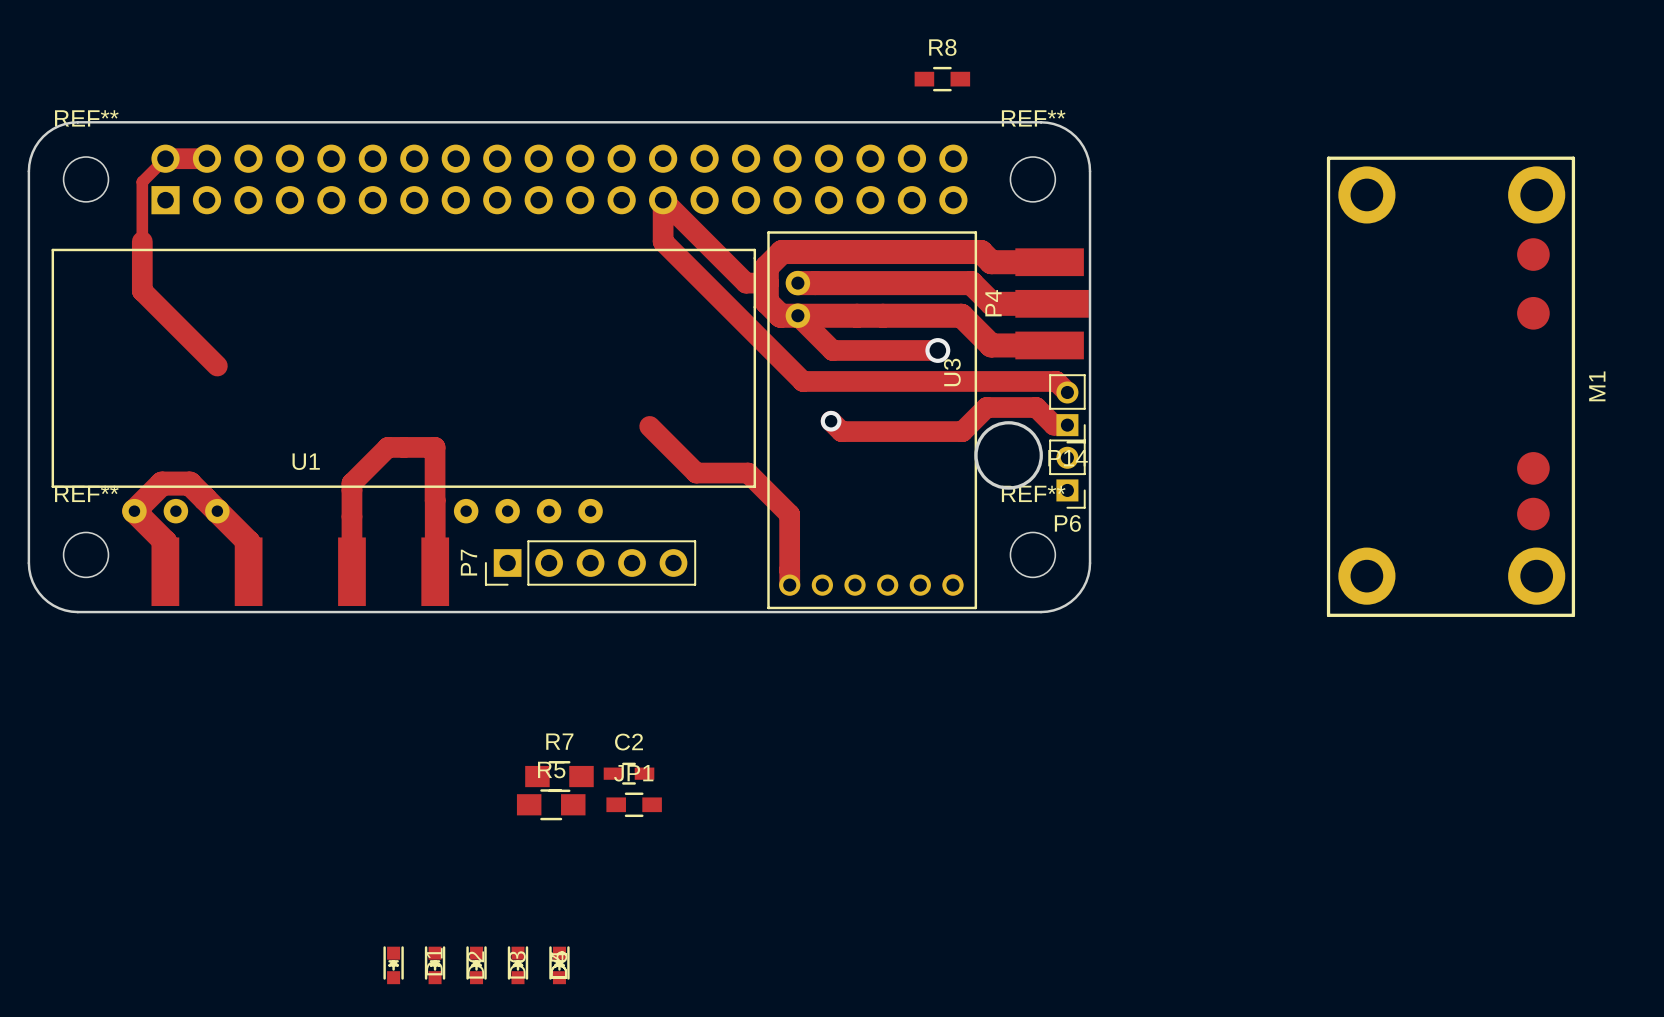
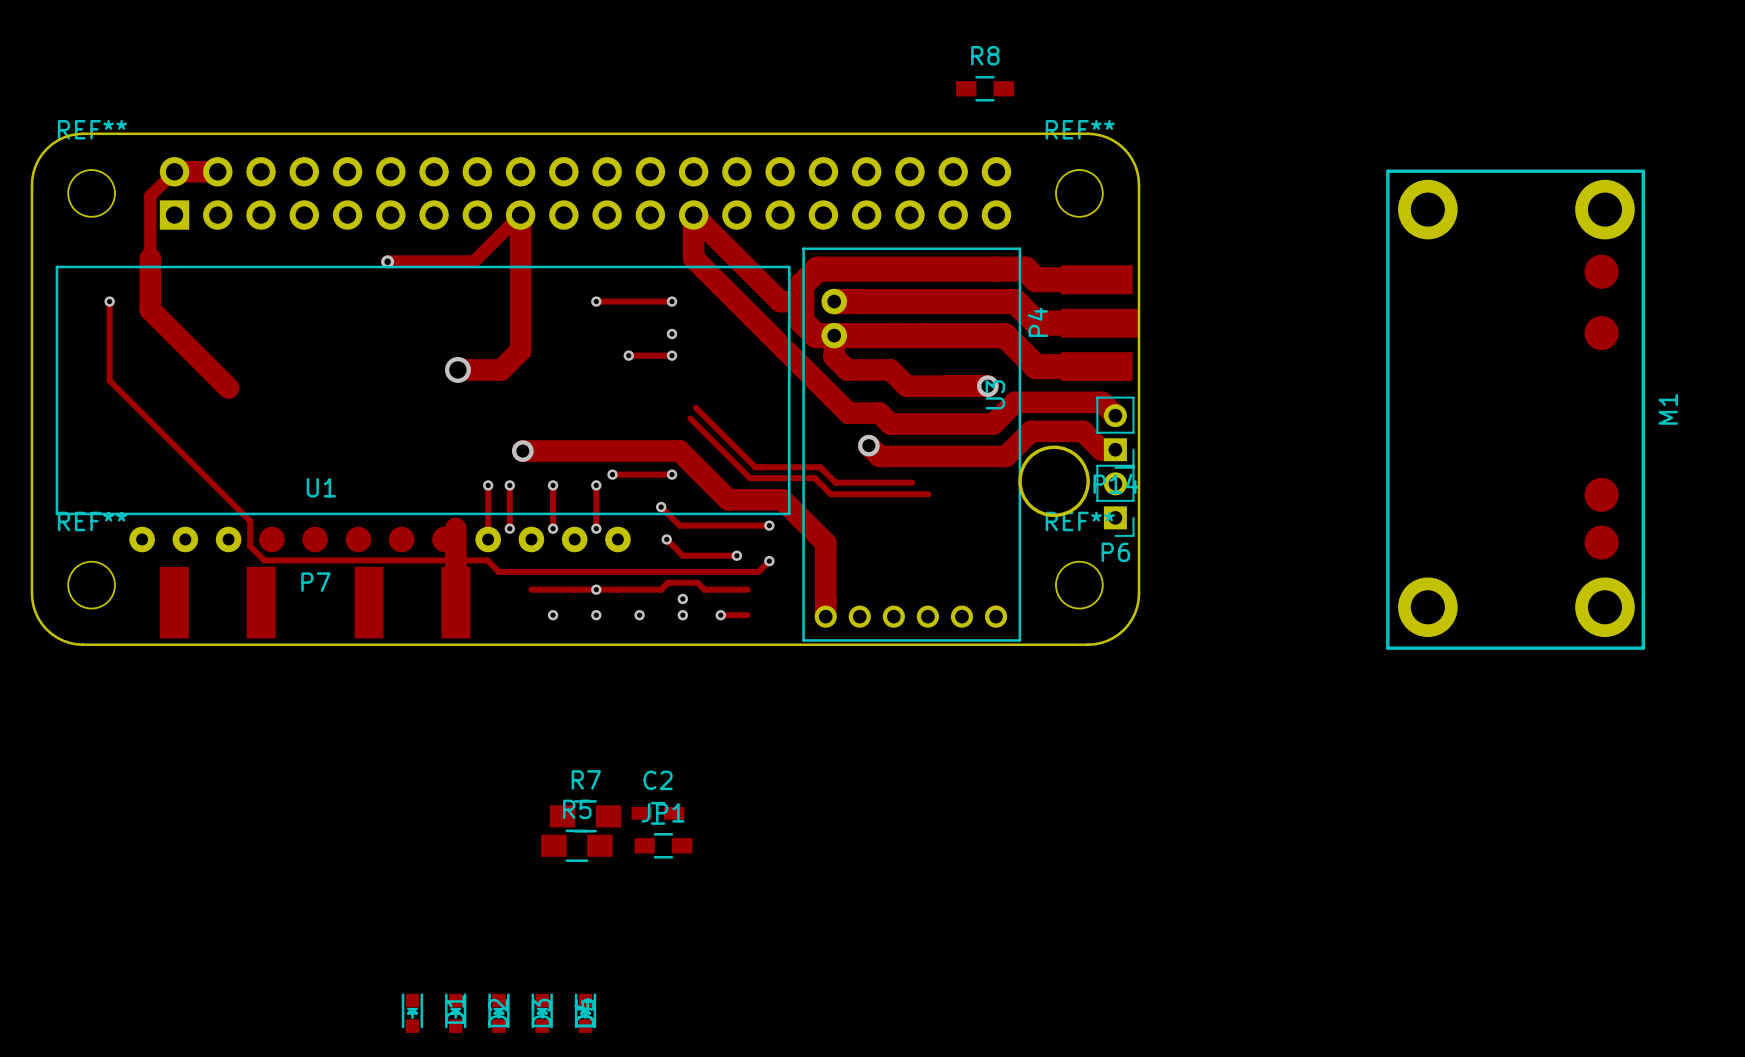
track: none -> (387, 261) (473, 261) (520, 215) (520, 350) (501, 369) (457, 369)
via: none -> (387, 261)
track: none -> (109, 301) (109, 380) (250, 521) (250, 546) (264, 560) (487, 560) (498, 571) (758, 571) (769, 561)
via: none -> (109, 301)
track: none -> (596, 301) (672, 301)
via: none -> (596, 301)
via: none -> (672, 301)
via: none -> (672, 334)
track: (797, 315) (832, 350) (937, 350) -> (834, 335) (834, 356) (847, 369) (890, 369) (906, 386) (987, 386)
track: none -> (628, 355) (672, 355)
via: none -> (628, 355)
via: none -> (672, 355)
via: none -> (457, 369)
via position: (937, 350) -> (987, 386)
track: (802, 381) (1056, 381) -> (839, 404) (848, 413) (879, 413) (890, 424) (993, 424) (1014, 402) (1102, 402) (1103, 404)
track: none -> (695, 407) (755, 467) (820, 467) (835, 482) (912, 482)
track: none -> (690, 418) (749, 478) (814, 478) (831, 494) (928, 494)
track: none -> (522, 451) (679, 451)
via: none -> (522, 451)
track: none -> (612, 474) (672, 474)
via: none -> (612, 474)
via: none -> (672, 474)
track: none -> (488, 485) (488, 539)
via: none -> (488, 485)
track: none -> (509, 485) (509, 528)
via: none -> (509, 485)
track: none -> (553, 485) (553, 528)
via: none -> (553, 485)
track: none -> (596, 485) (596, 528)
via: none -> (596, 485)
track: none -> (661, 507) (679, 525) (769, 525)
via: none -> (661, 507)
via: none -> (769, 525)
track: (435, 500) (435, 447) (387, 447) (351, 483) (351, 571) -> none
via: none -> (509, 528)
via: none -> (553, 528)
via: none -> (596, 528)
track: none -> (666, 539) (682, 555) (736, 555)
via: none -> (666, 539)
via: none -> (736, 555)
via: none -> (769, 561)
P7 footprint: [484, 540, 697, 586] -> [259, 526, 458, 553]
track: none -> (531, 589) (661, 589) (668, 582) (697, 582) (704, 589) (747, 589)
via: none -> (596, 589)
P7 name position: P7 (468, 562) -> P7 (315, 582)
via: none -> (682, 598)
track: (165, 571) (165, 542) (134, 511) (162, 483) (189, 483) (248, 542) (248, 571) -> none
via: none -> (553, 615)
via: none -> (596, 615)
via: none -> (639, 615)
via: none -> (682, 615)
track: none -> (720, 615) (747, 615)
via: none -> (720, 615)

